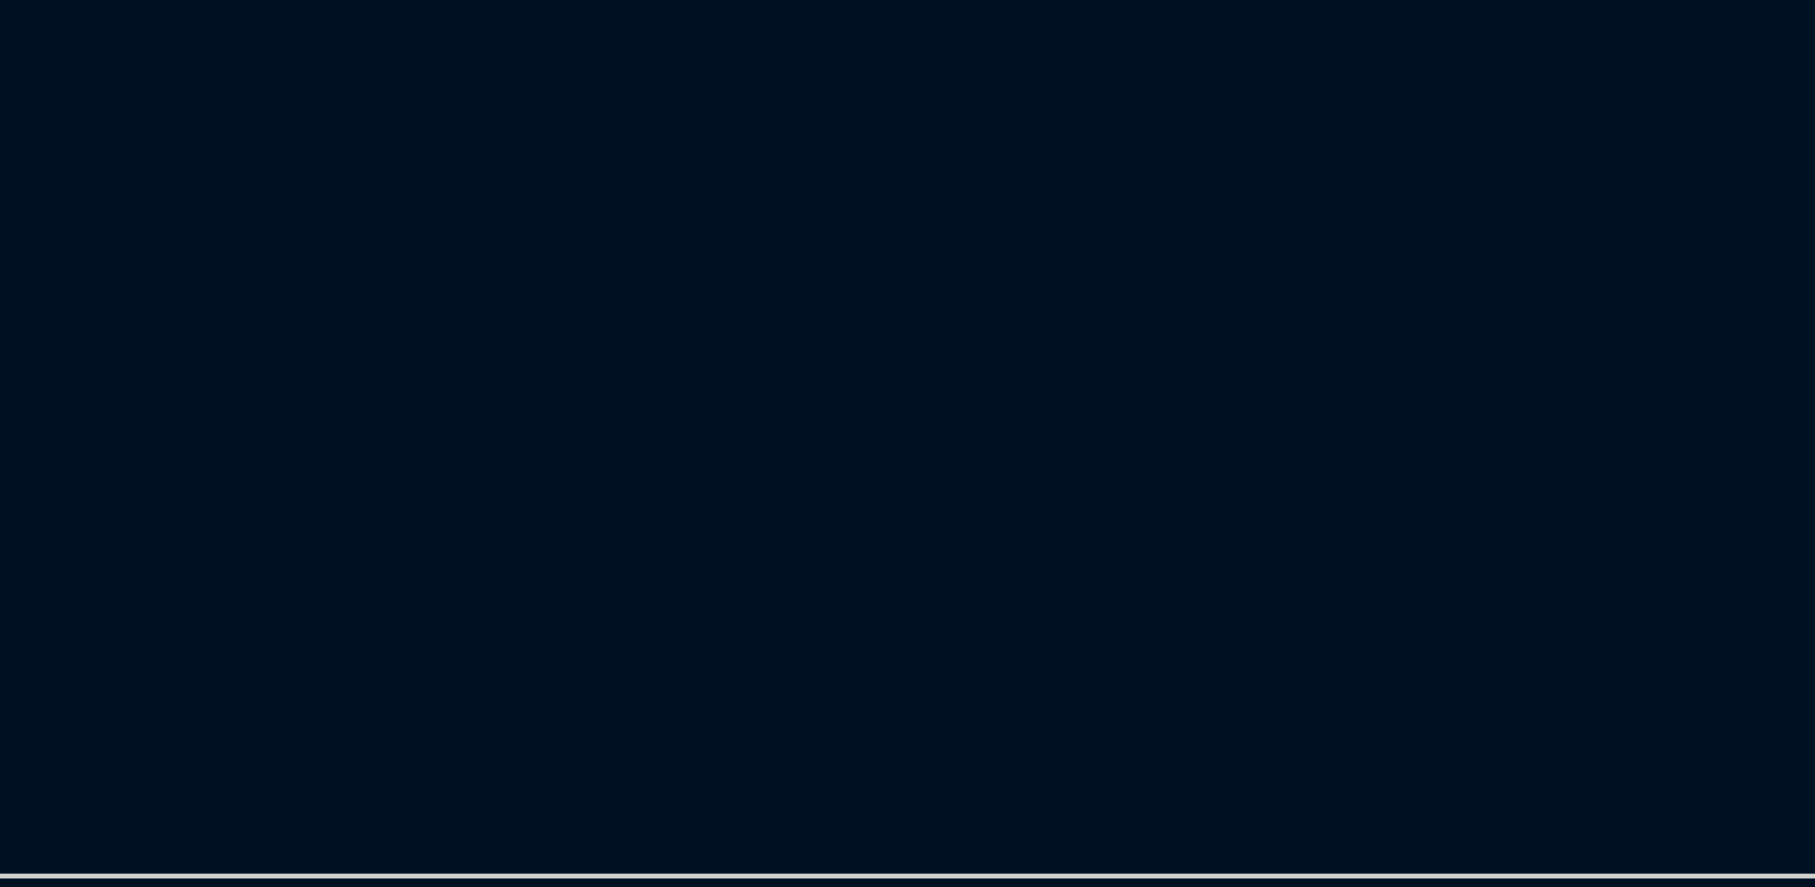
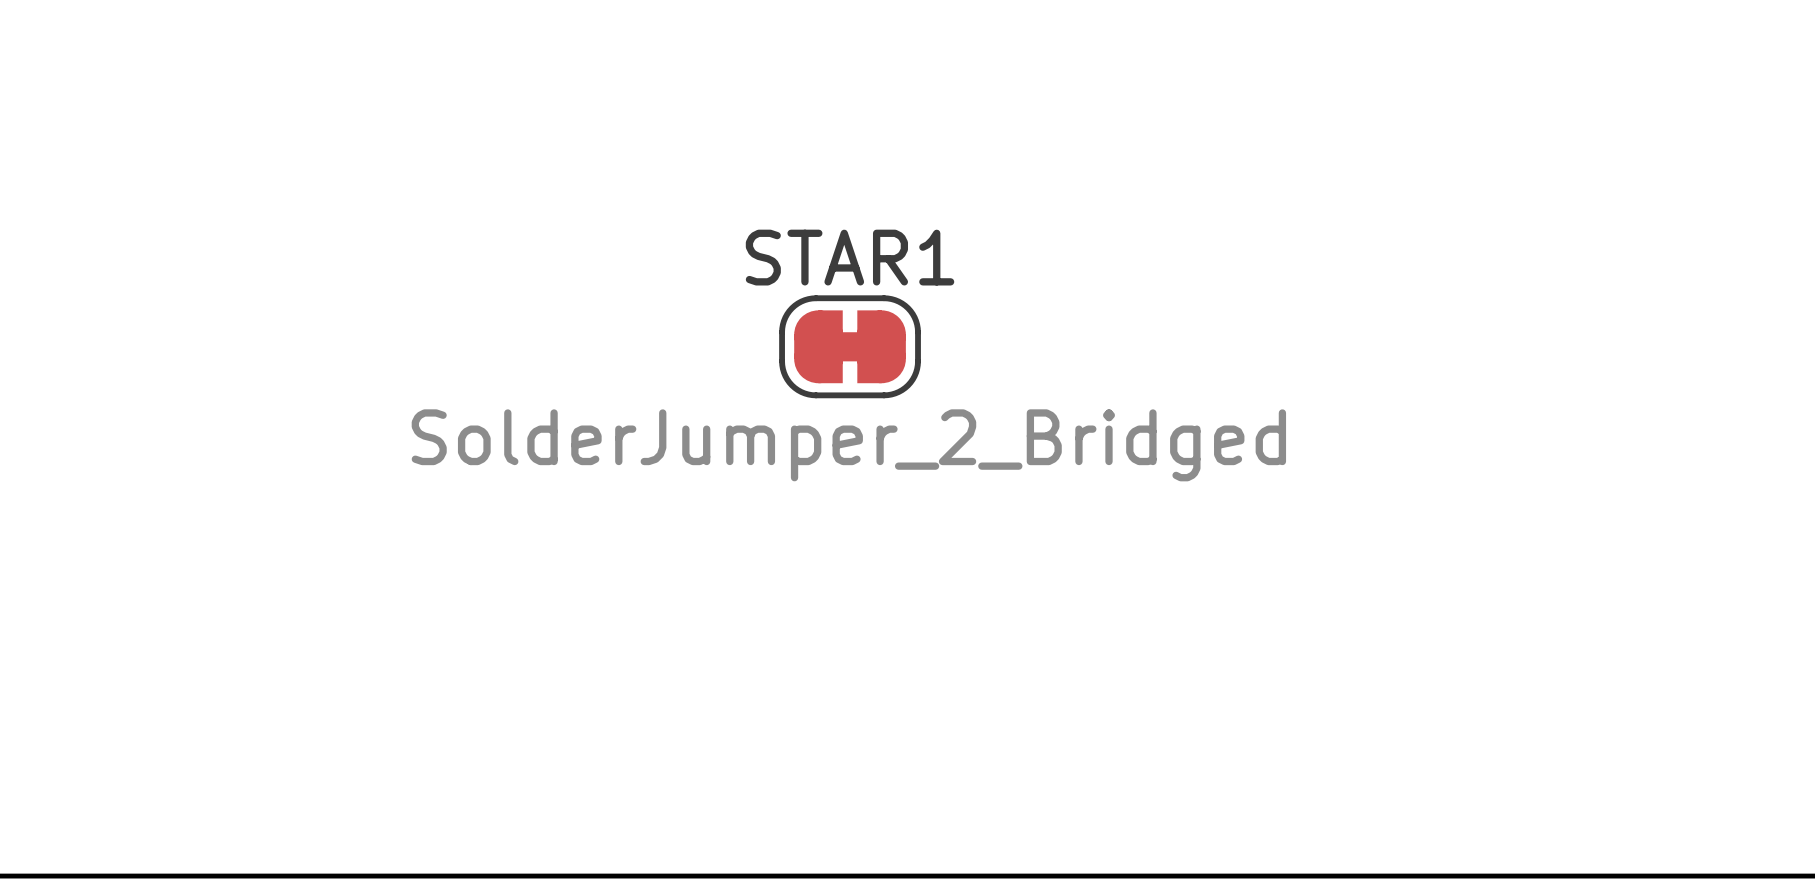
STAR1: none -> SolderJumper_2_Bridged (850, 346)

